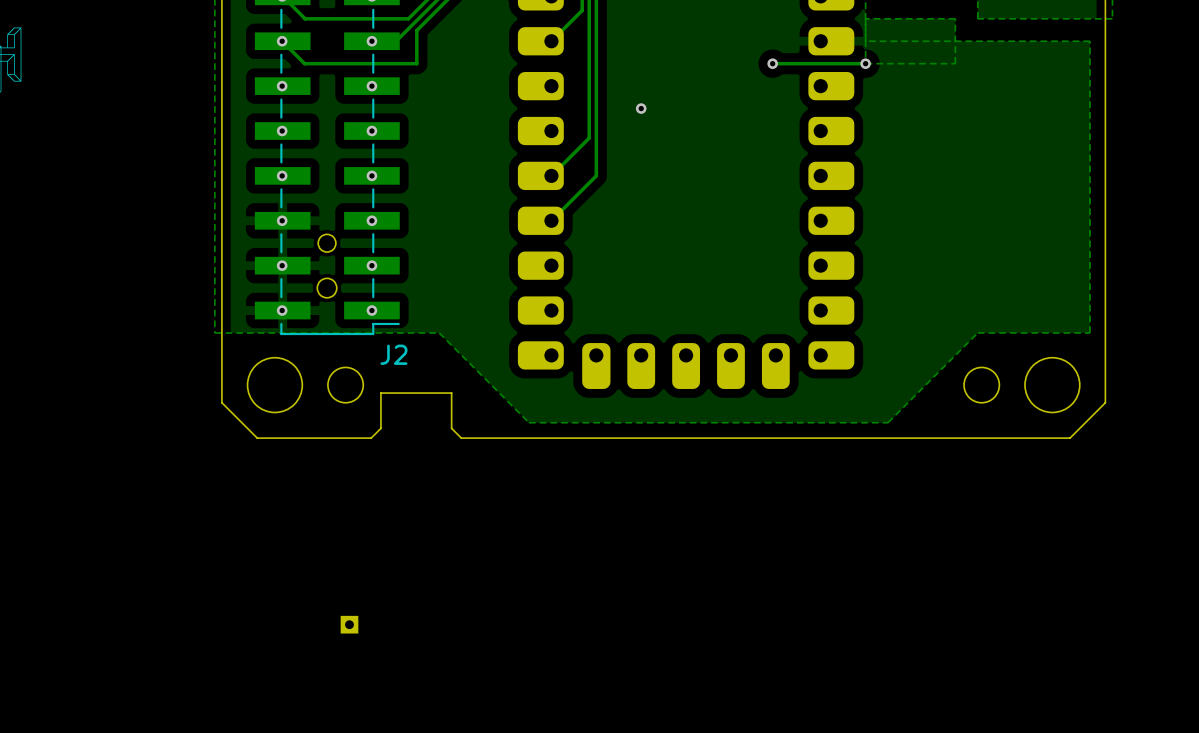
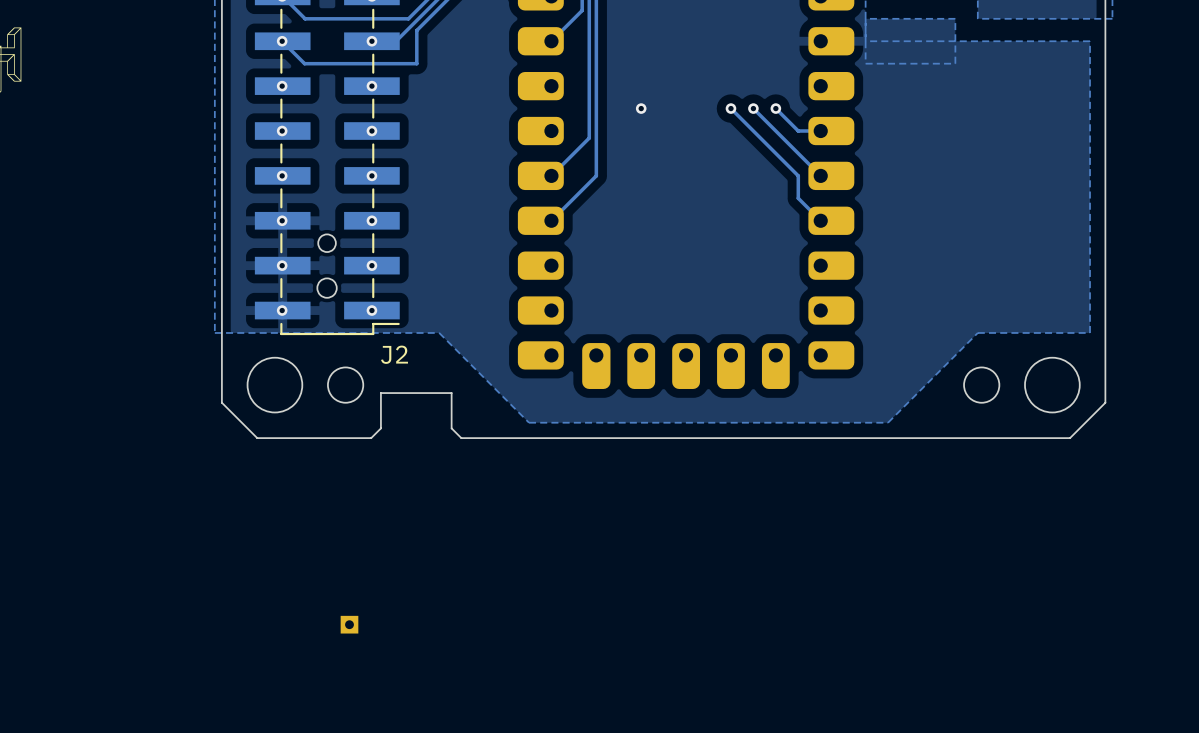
via: (772, 63) -> none
track: (865, 63) (772, 63) -> none
via: (865, 63) -> none
track: none -> (730, 108) (798, 175) (798, 198) (820, 220)
via: none -> (730, 108)
track: none -> (753, 108) (820, 175)
via: none -> (753, 108)
track: none -> (775, 108) (798, 131) (820, 131)
via: none -> (775, 108)

